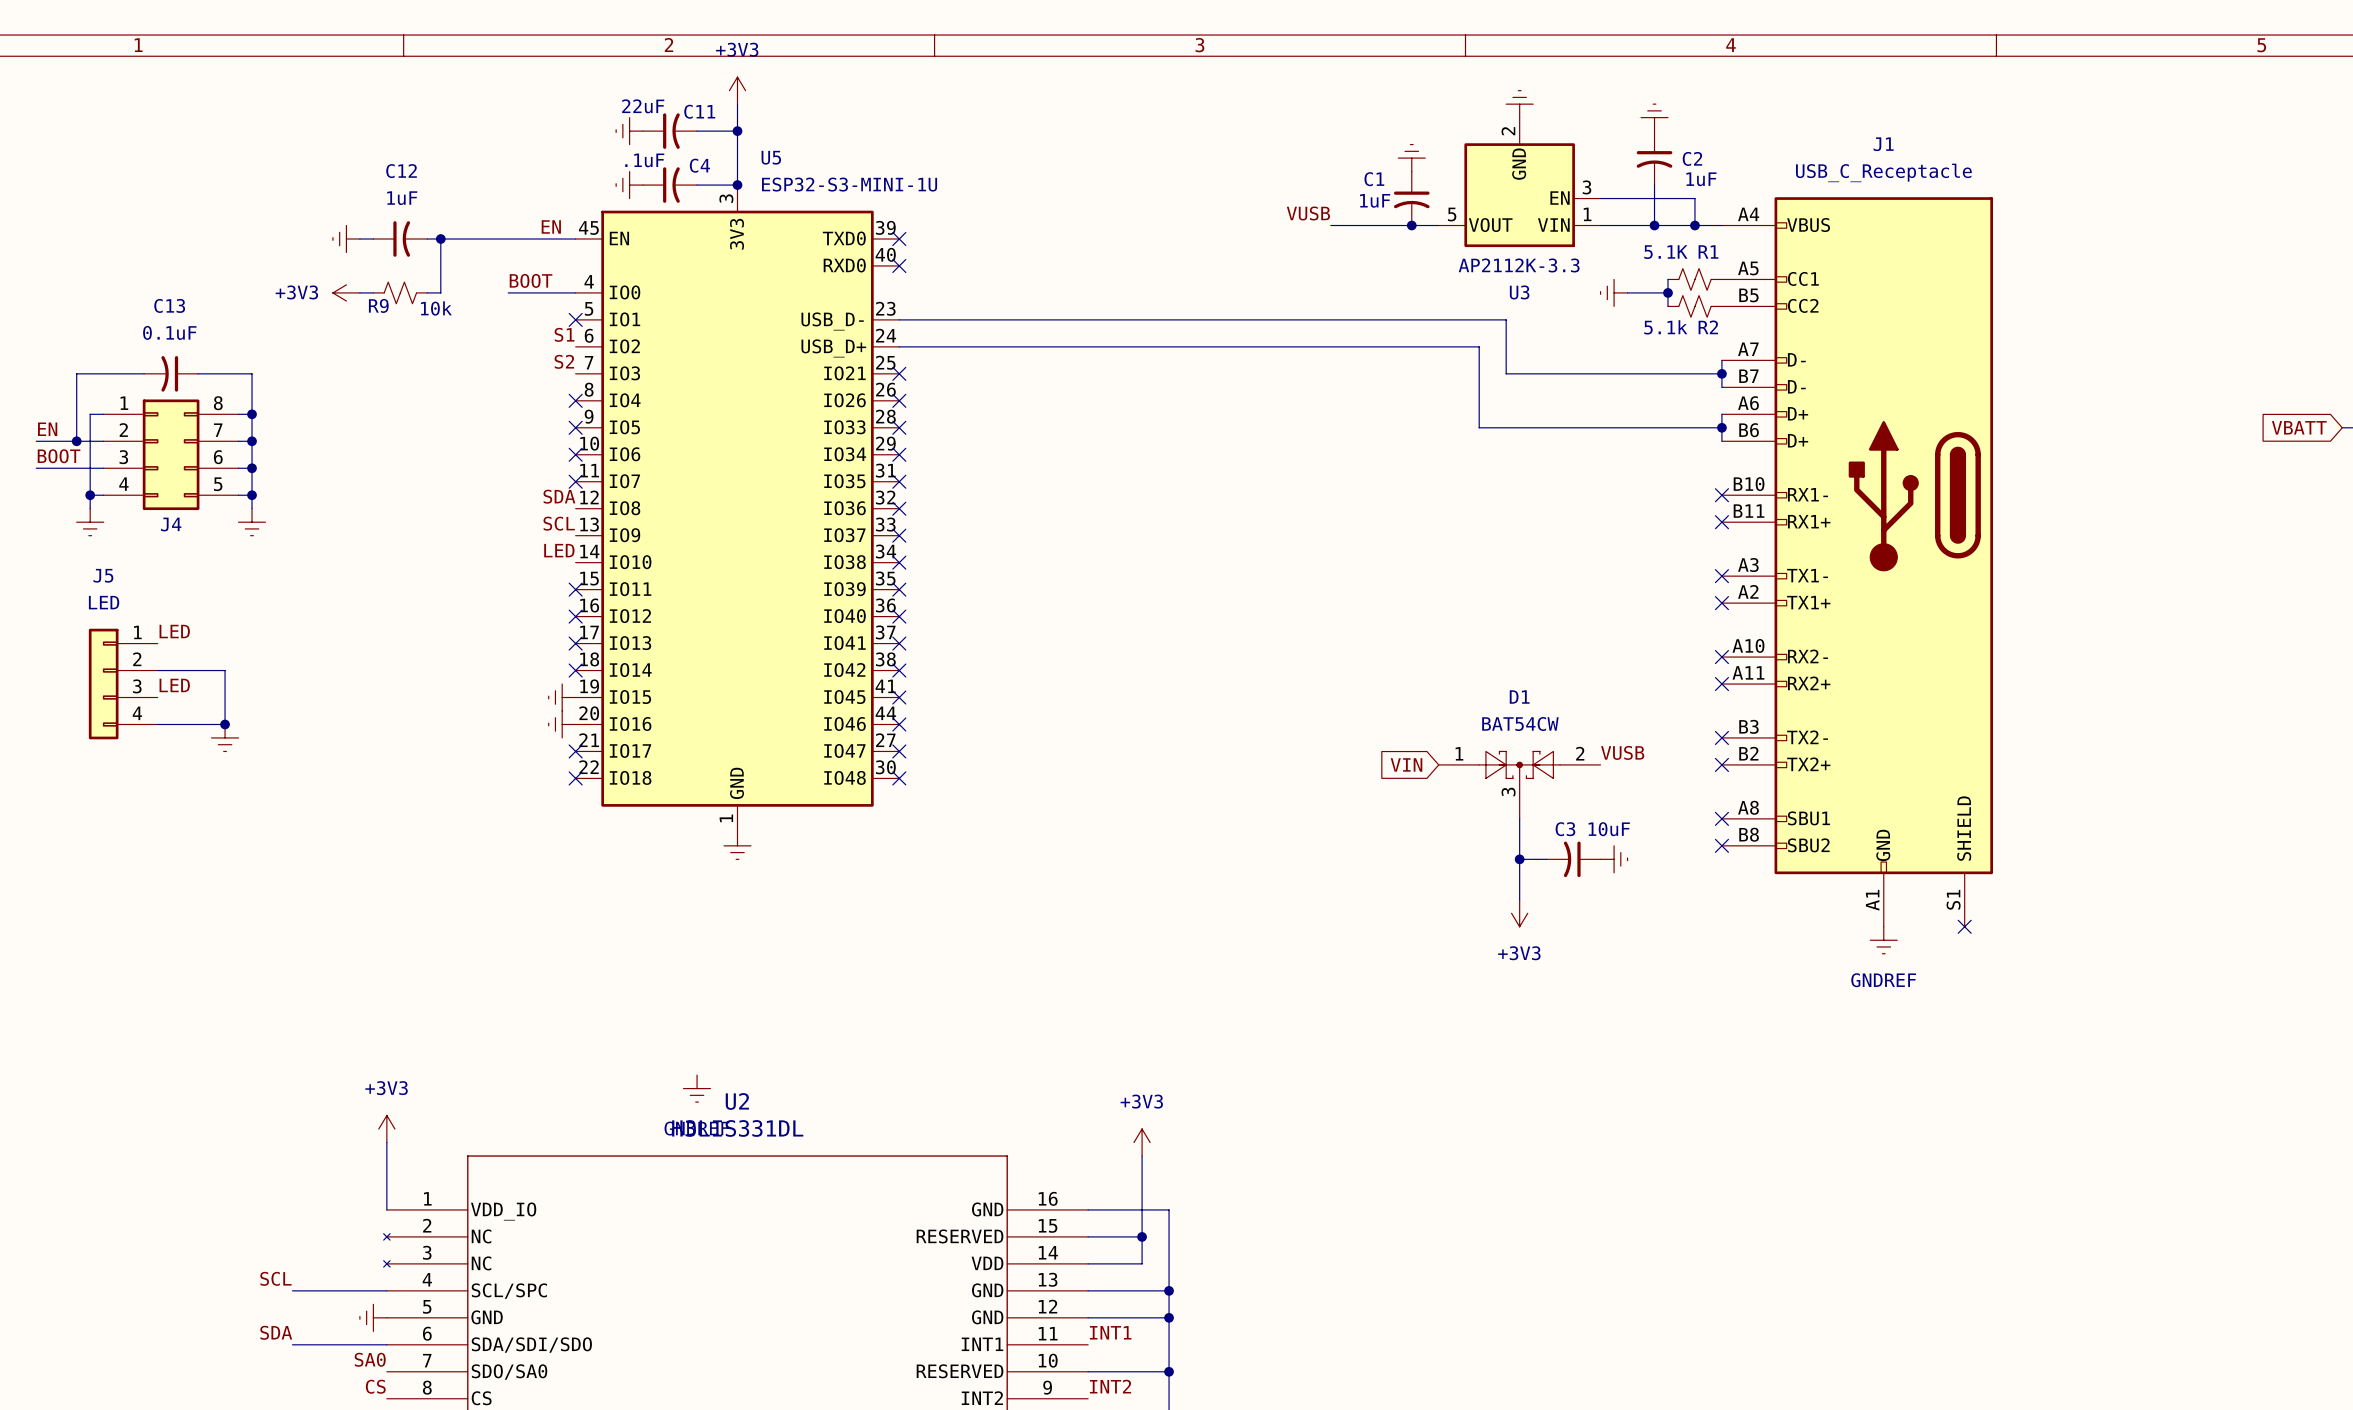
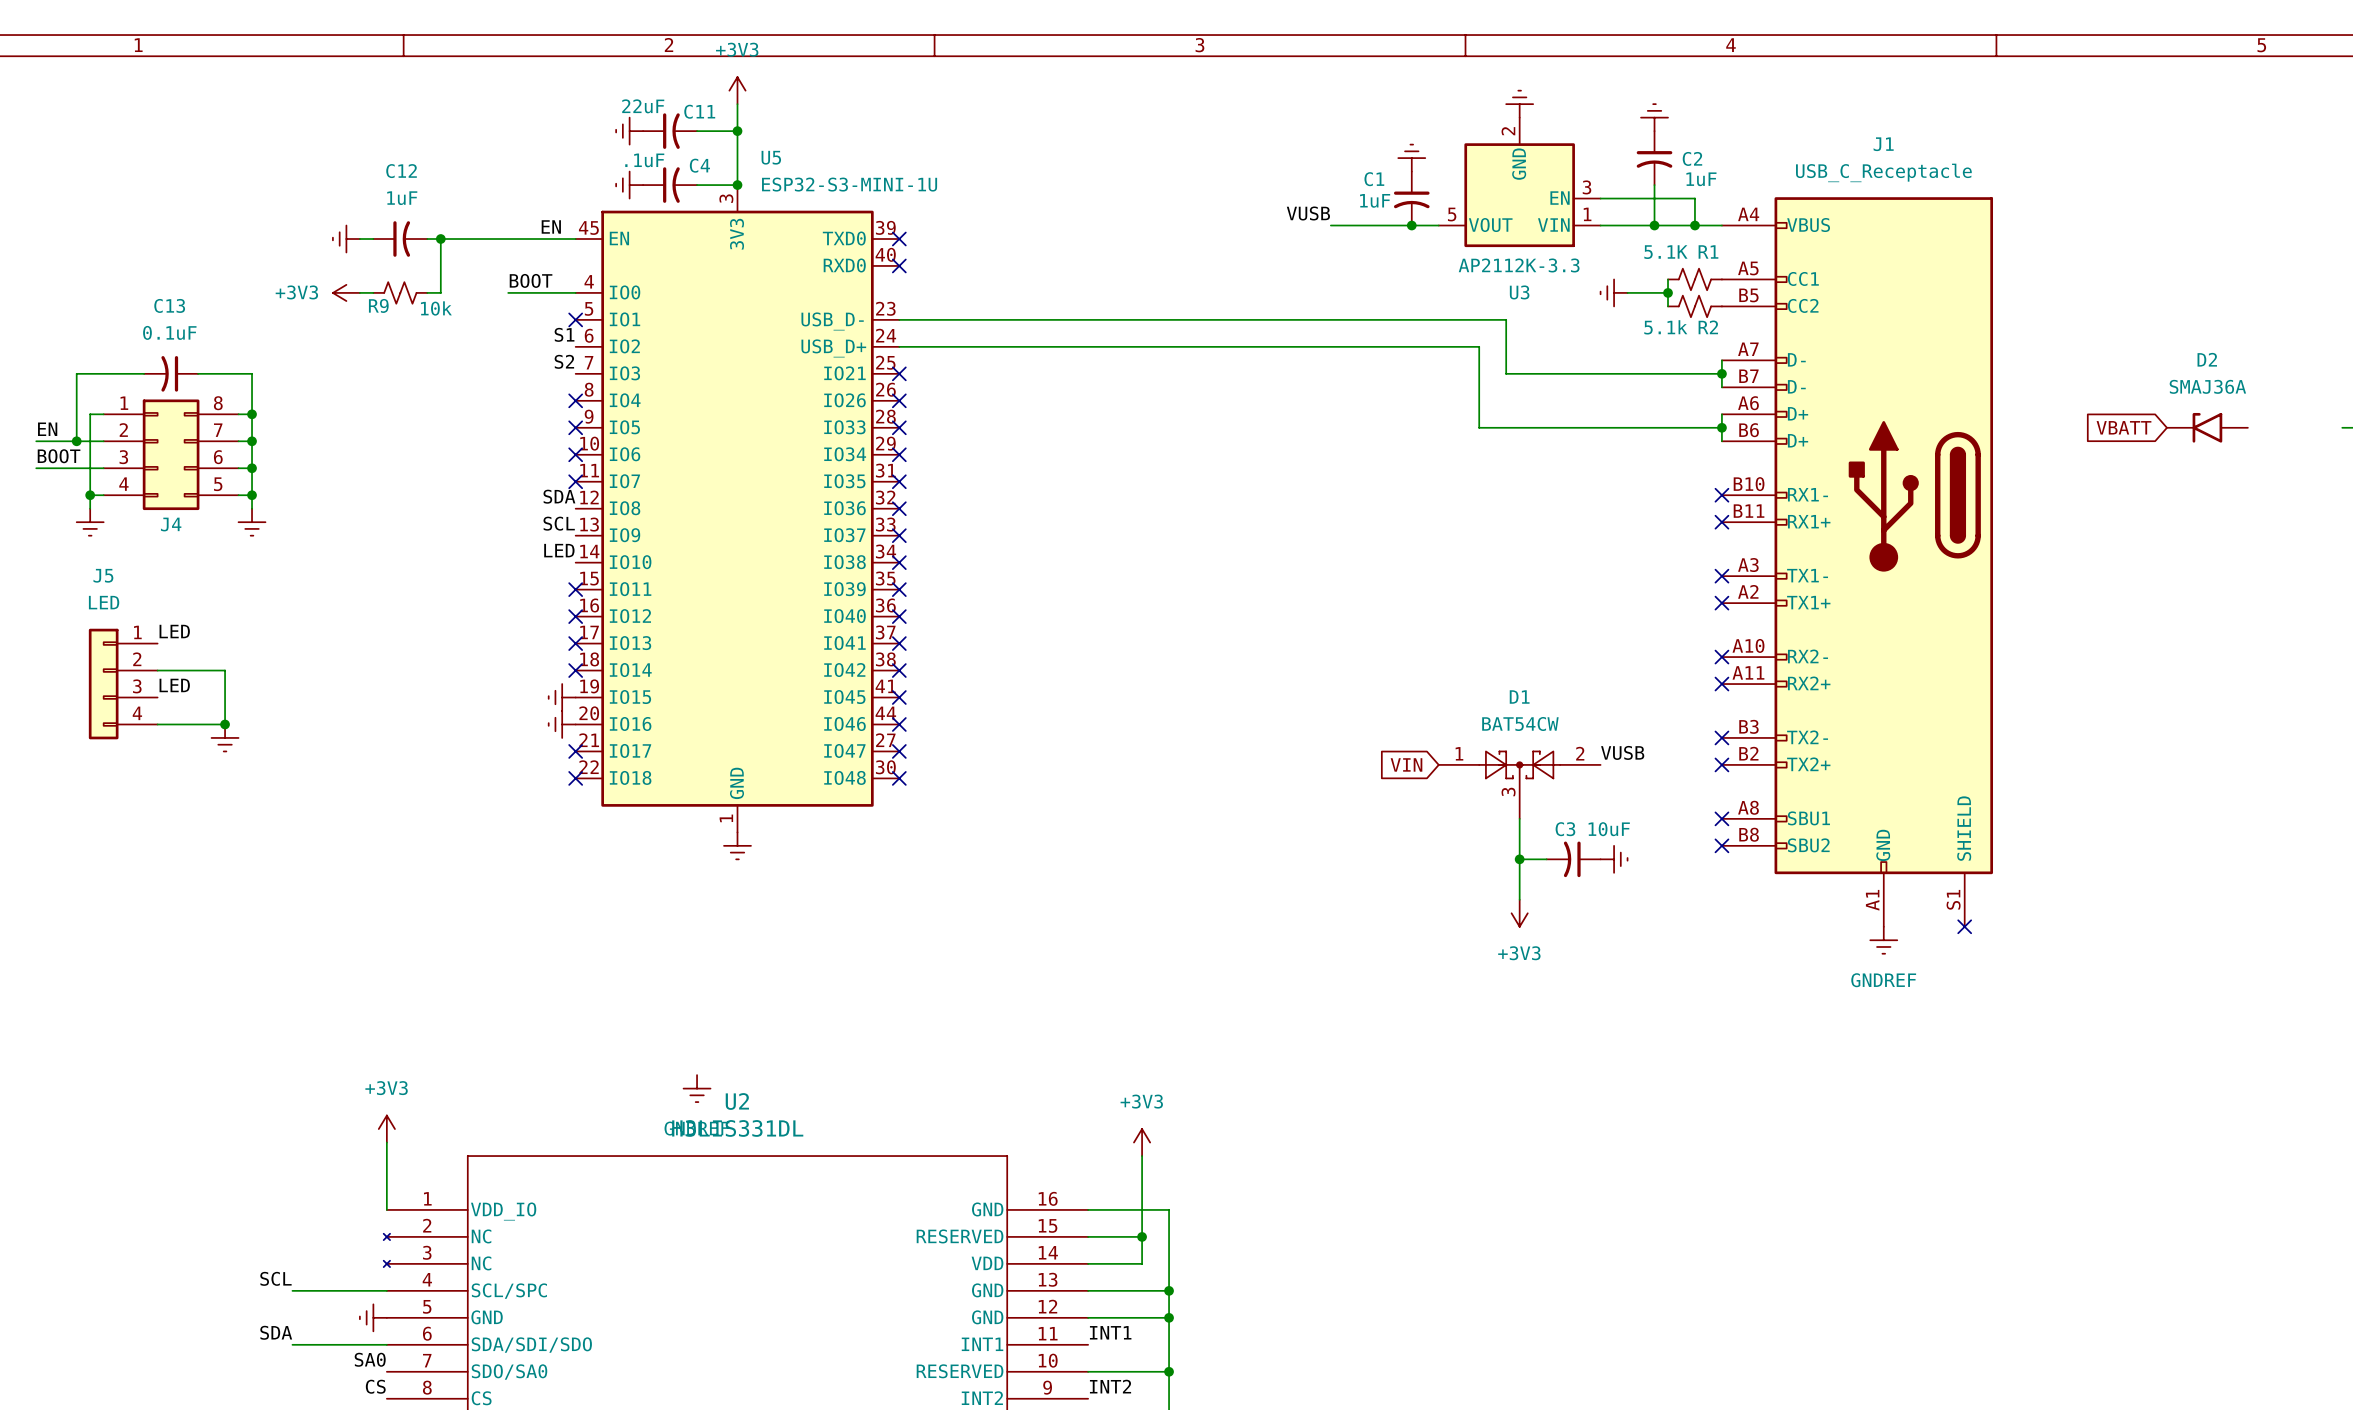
D2: none -> SMAJ36A (2207, 427)
global label position: VBATT (2299, 427) -> VBATT (2124, 427)

